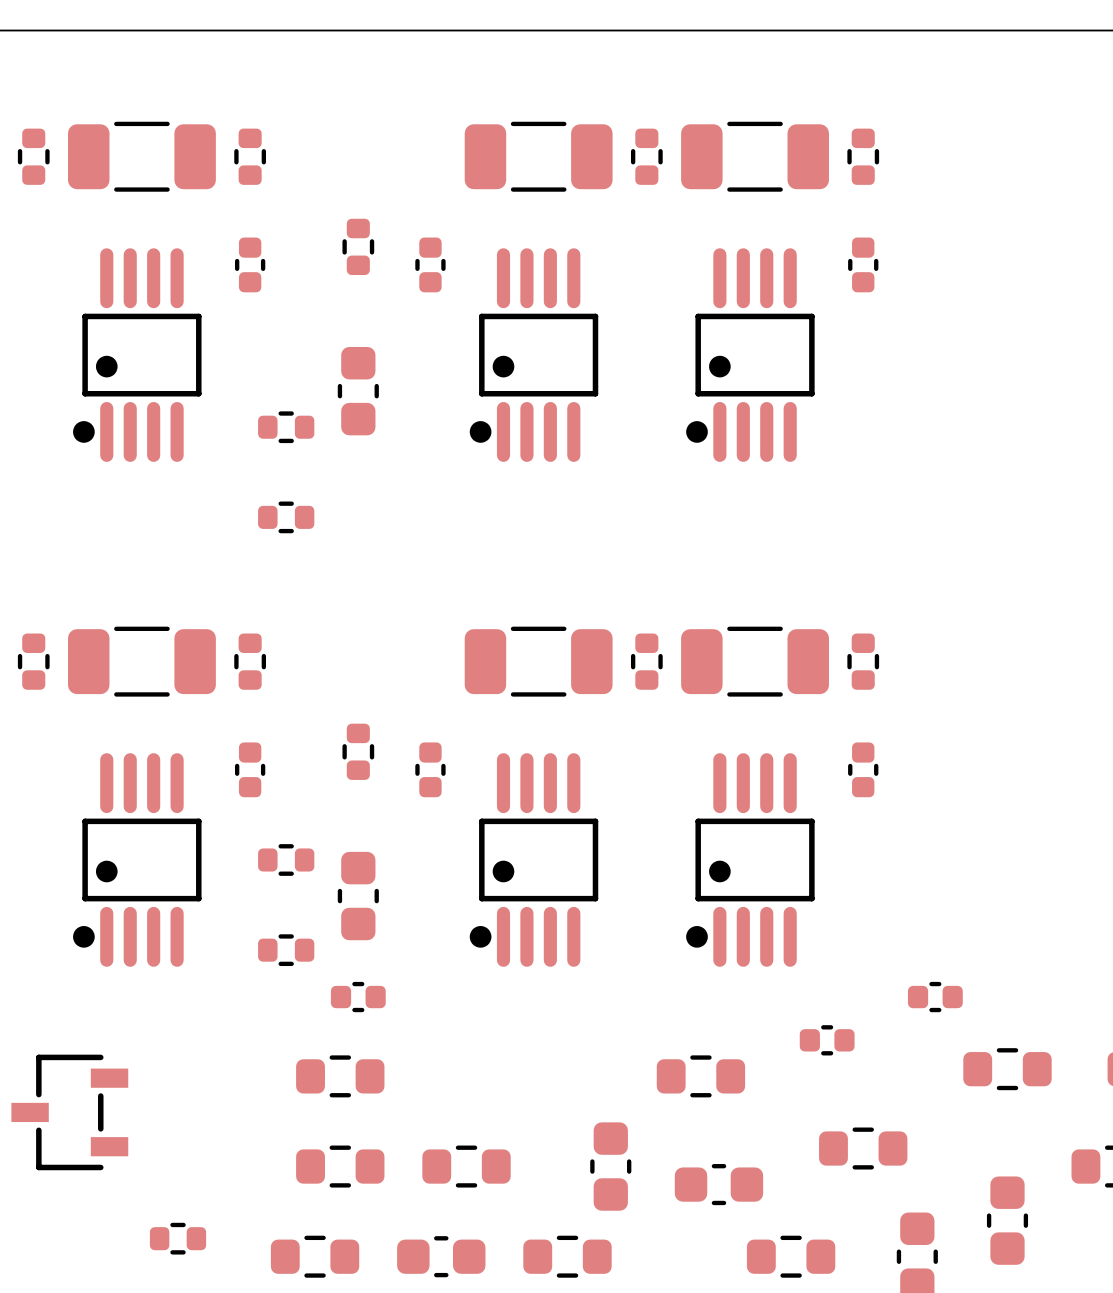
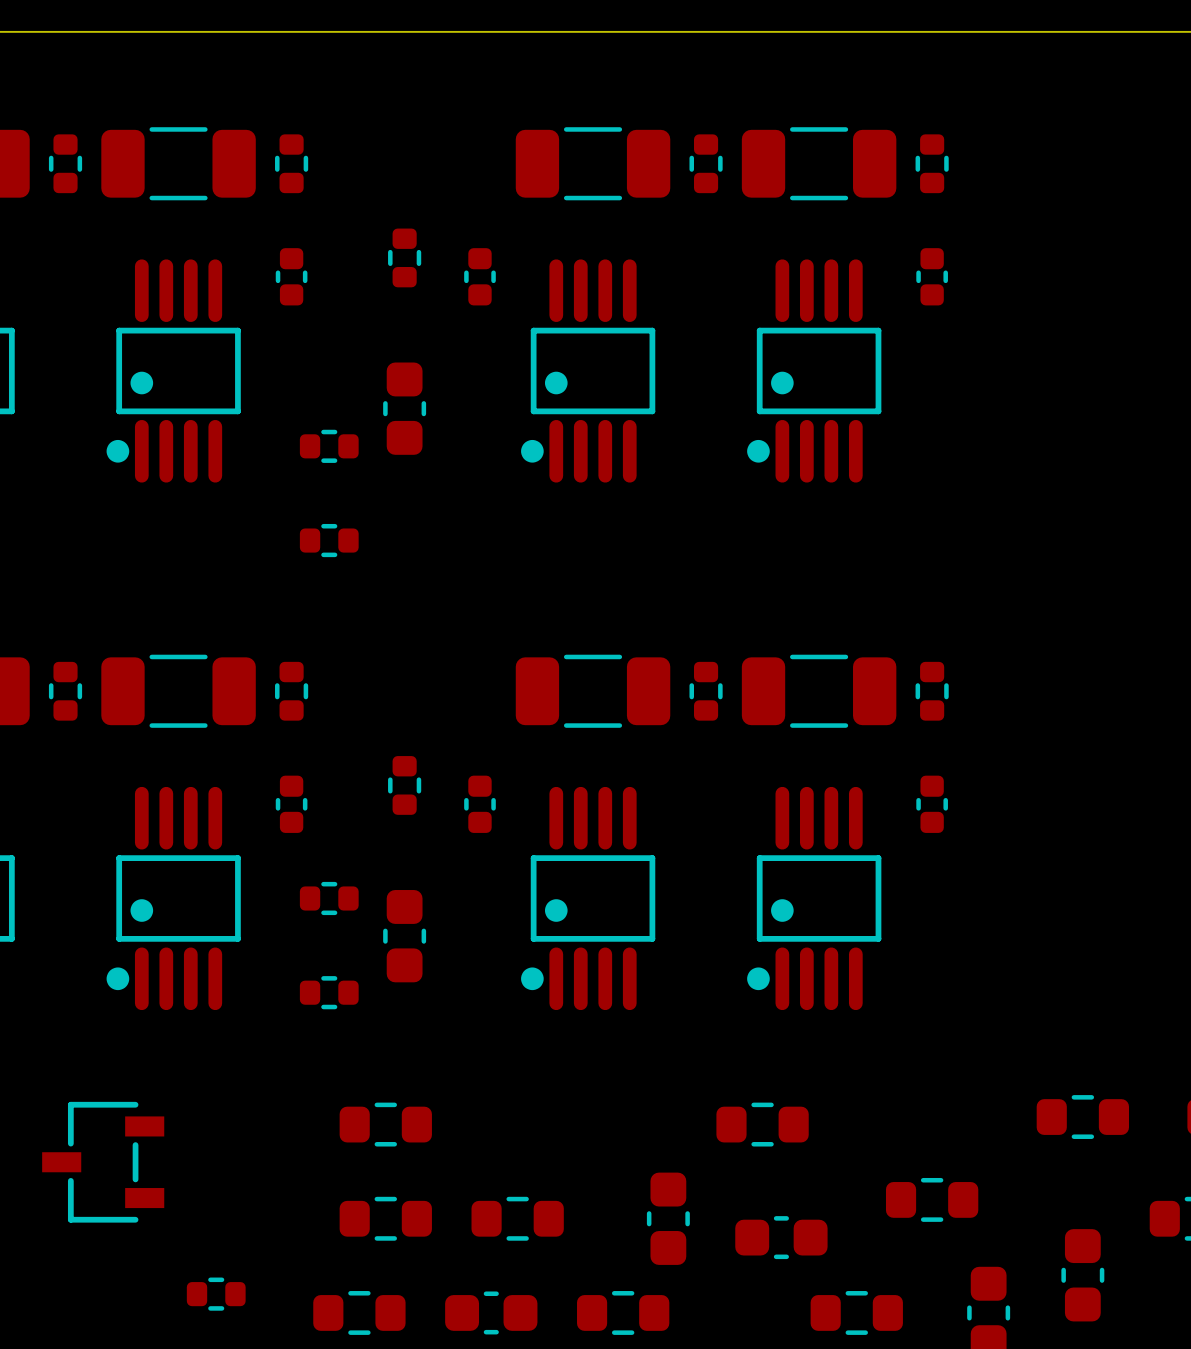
part: (358, 997) -> none
part: (935, 997) -> none
part: (827, 1040) -> none

